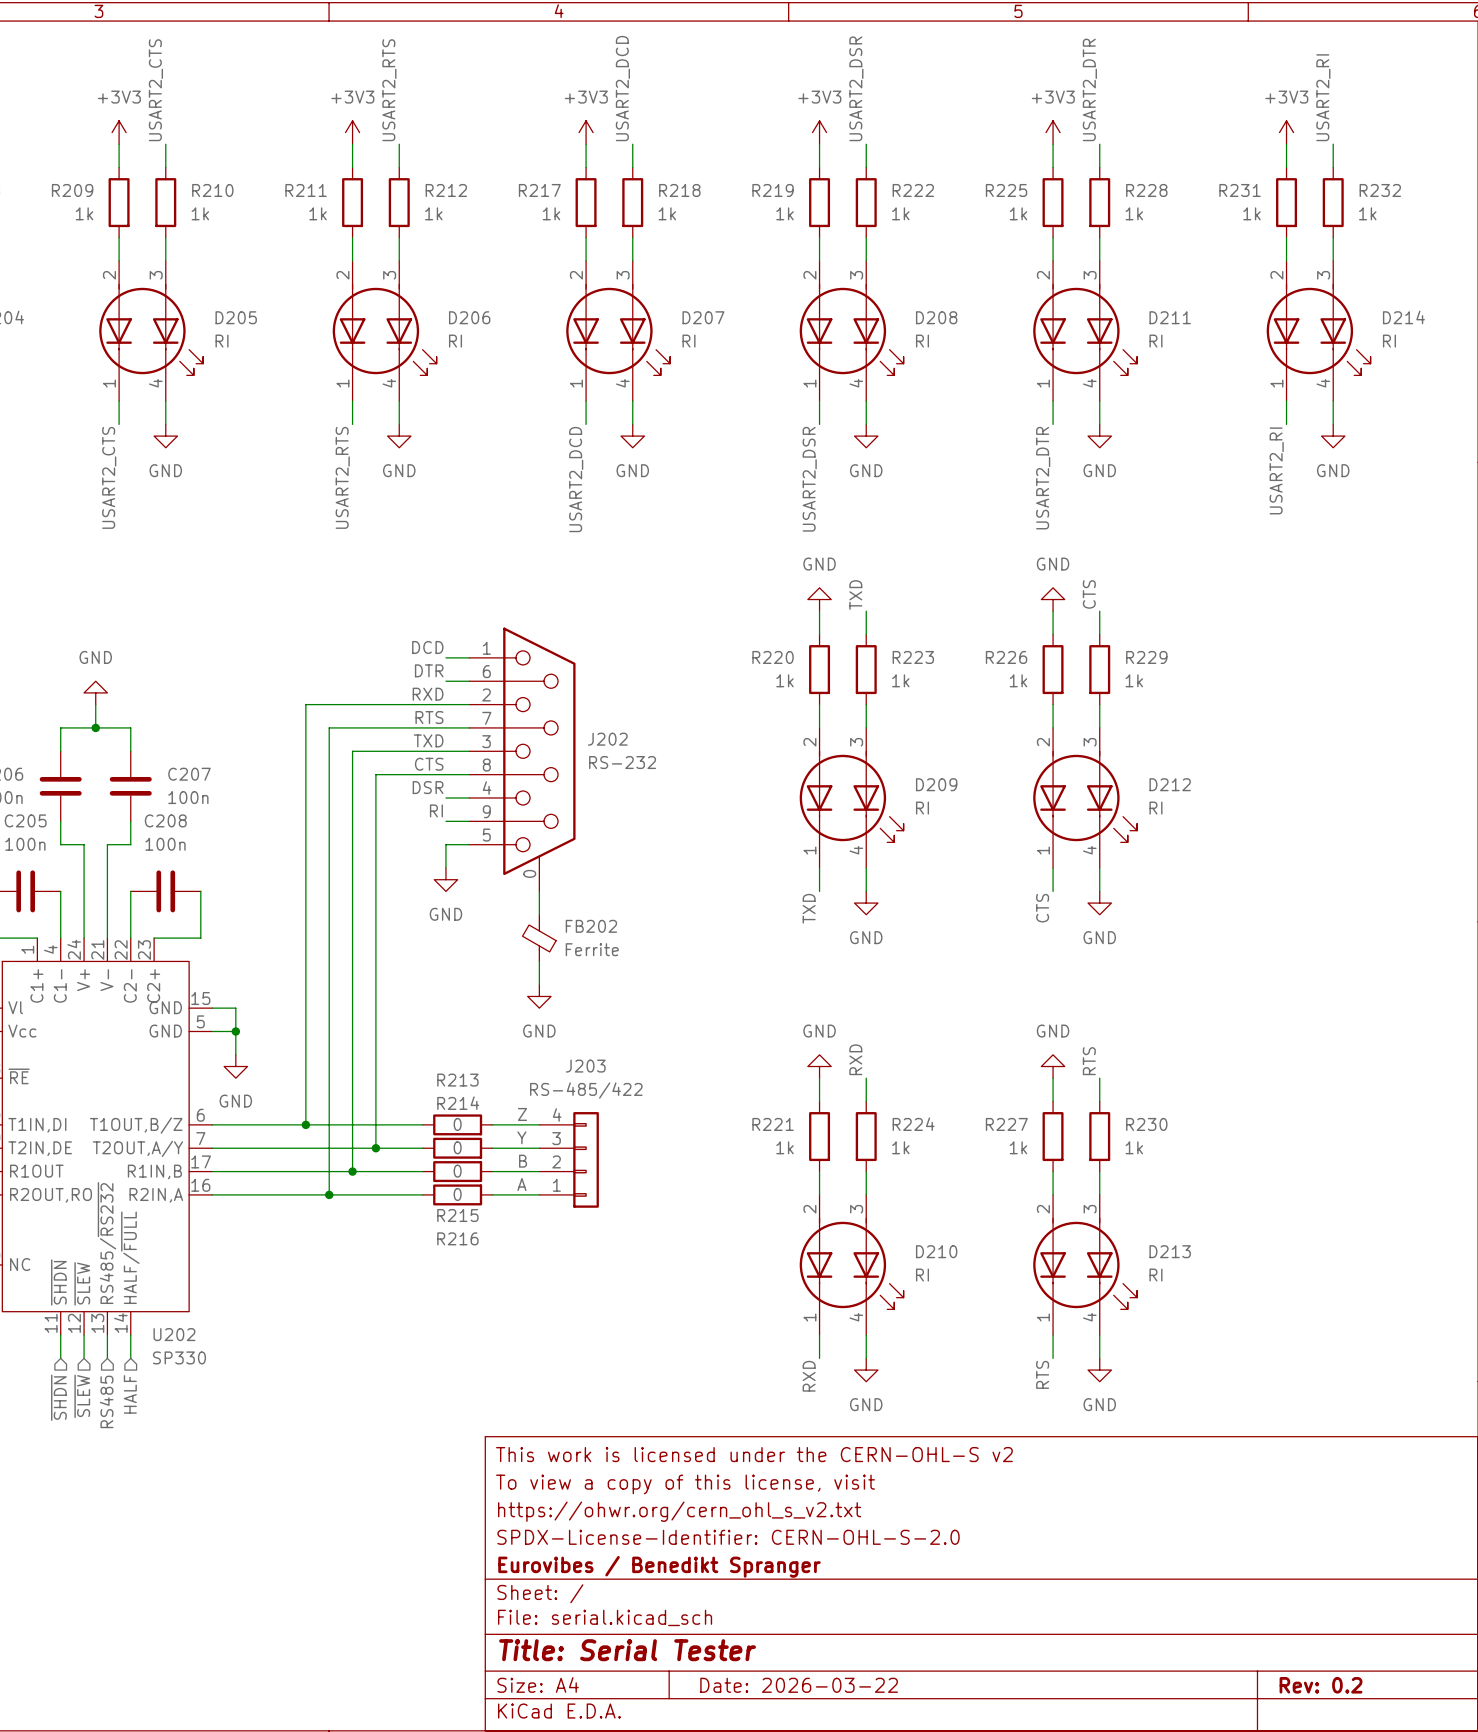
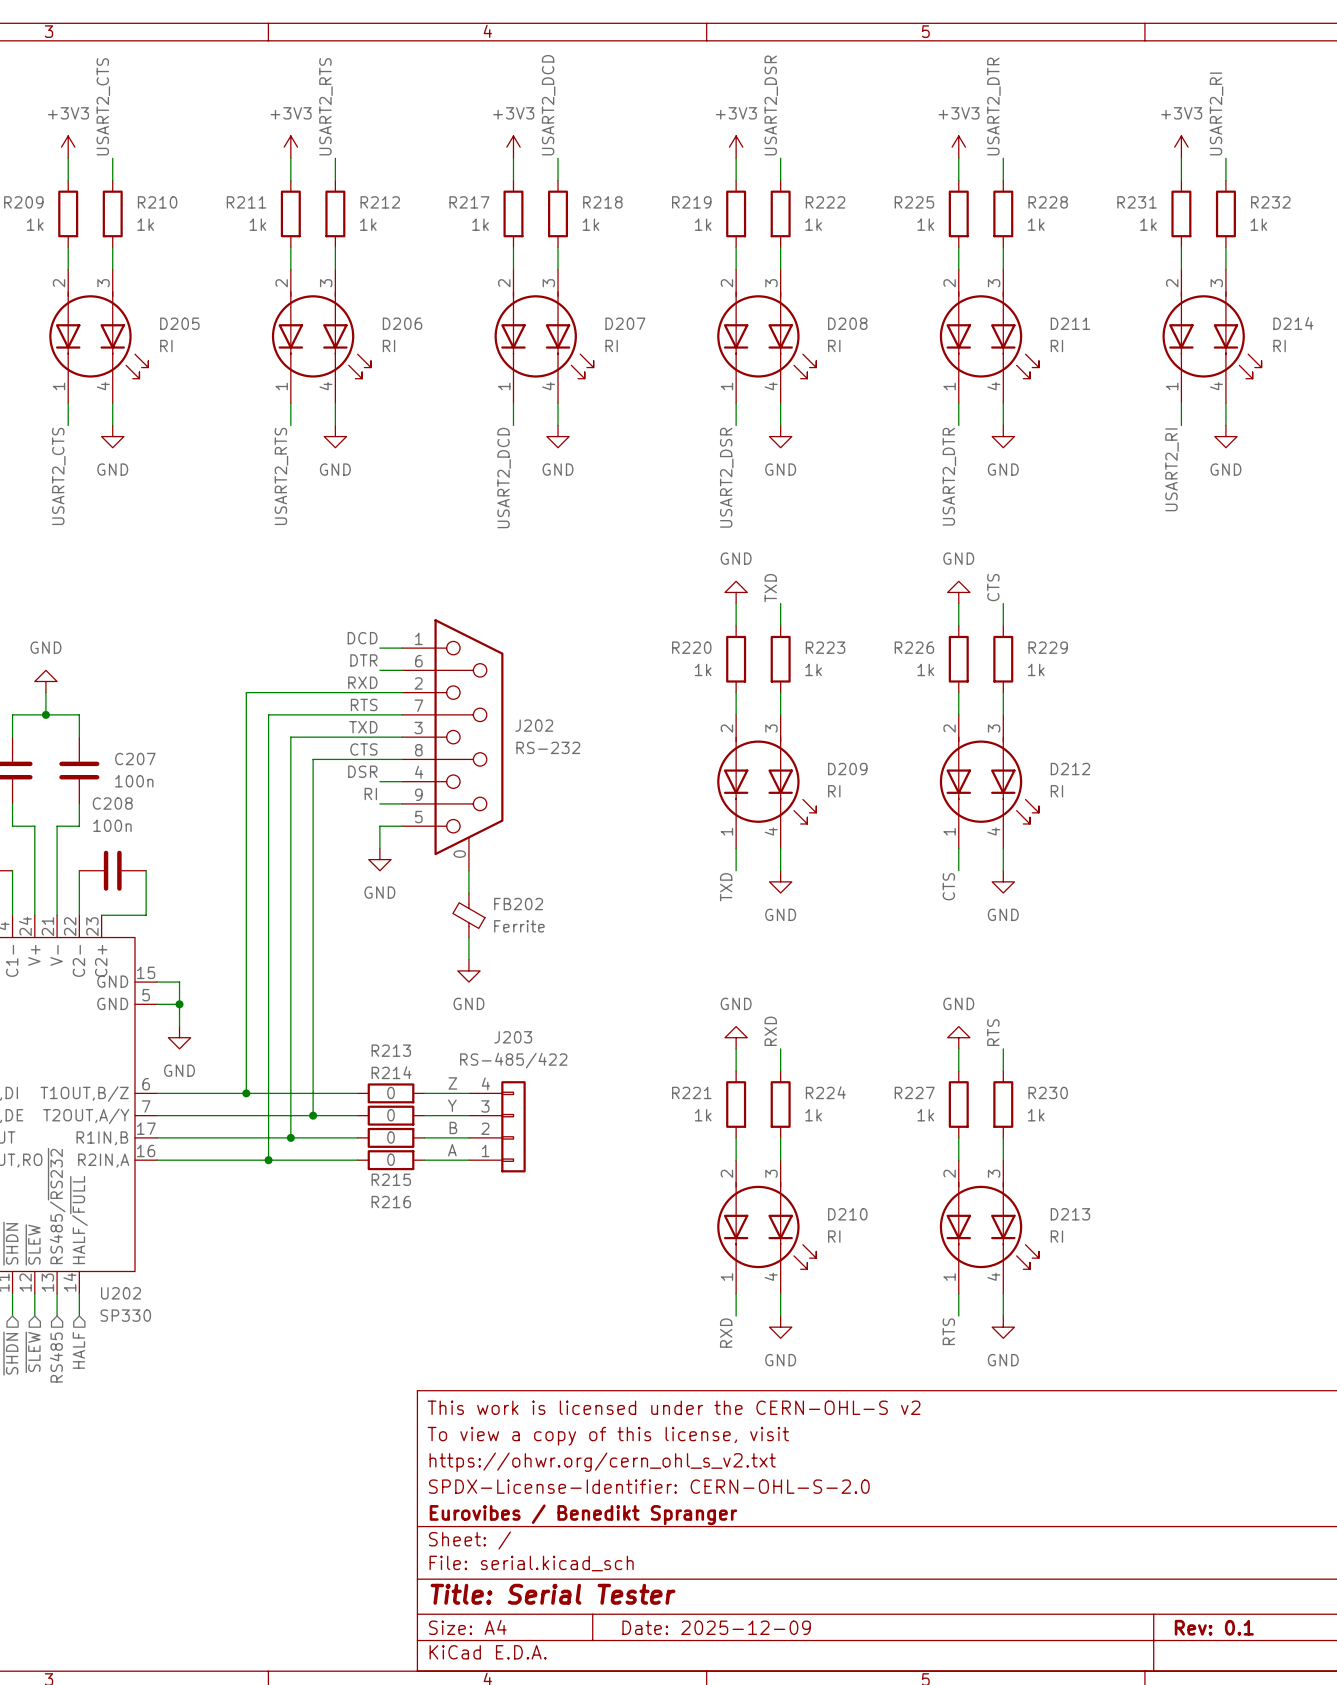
title block: Date: 2026-03-22 (799, 1685) -> Date: 2025-12-09 (716, 1627)
title block: Rev: 0.2 (1321, 1685) -> Rev: 0.1 (1214, 1627)

